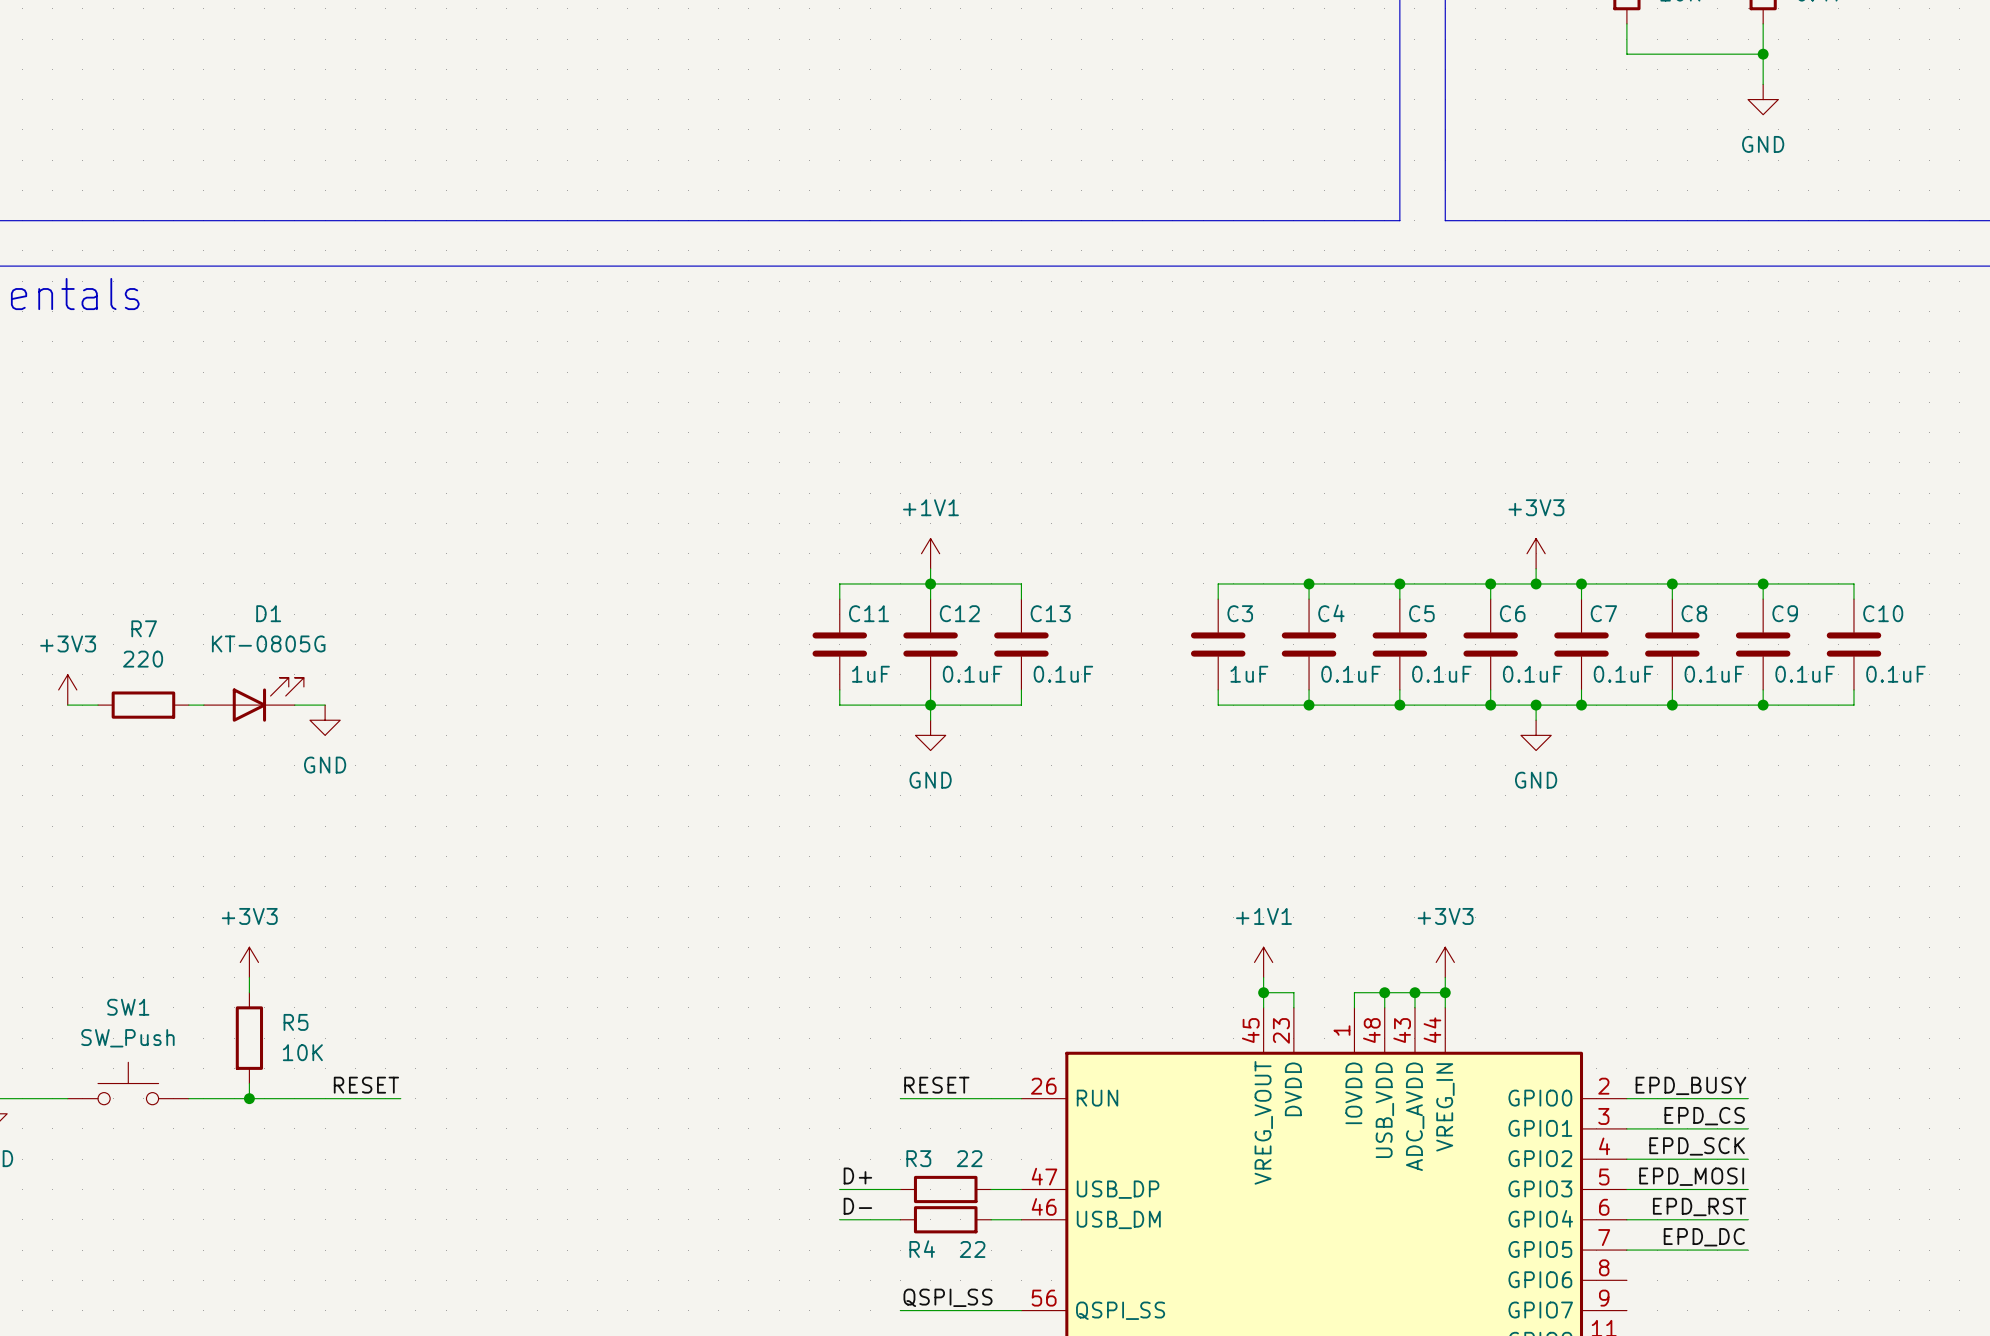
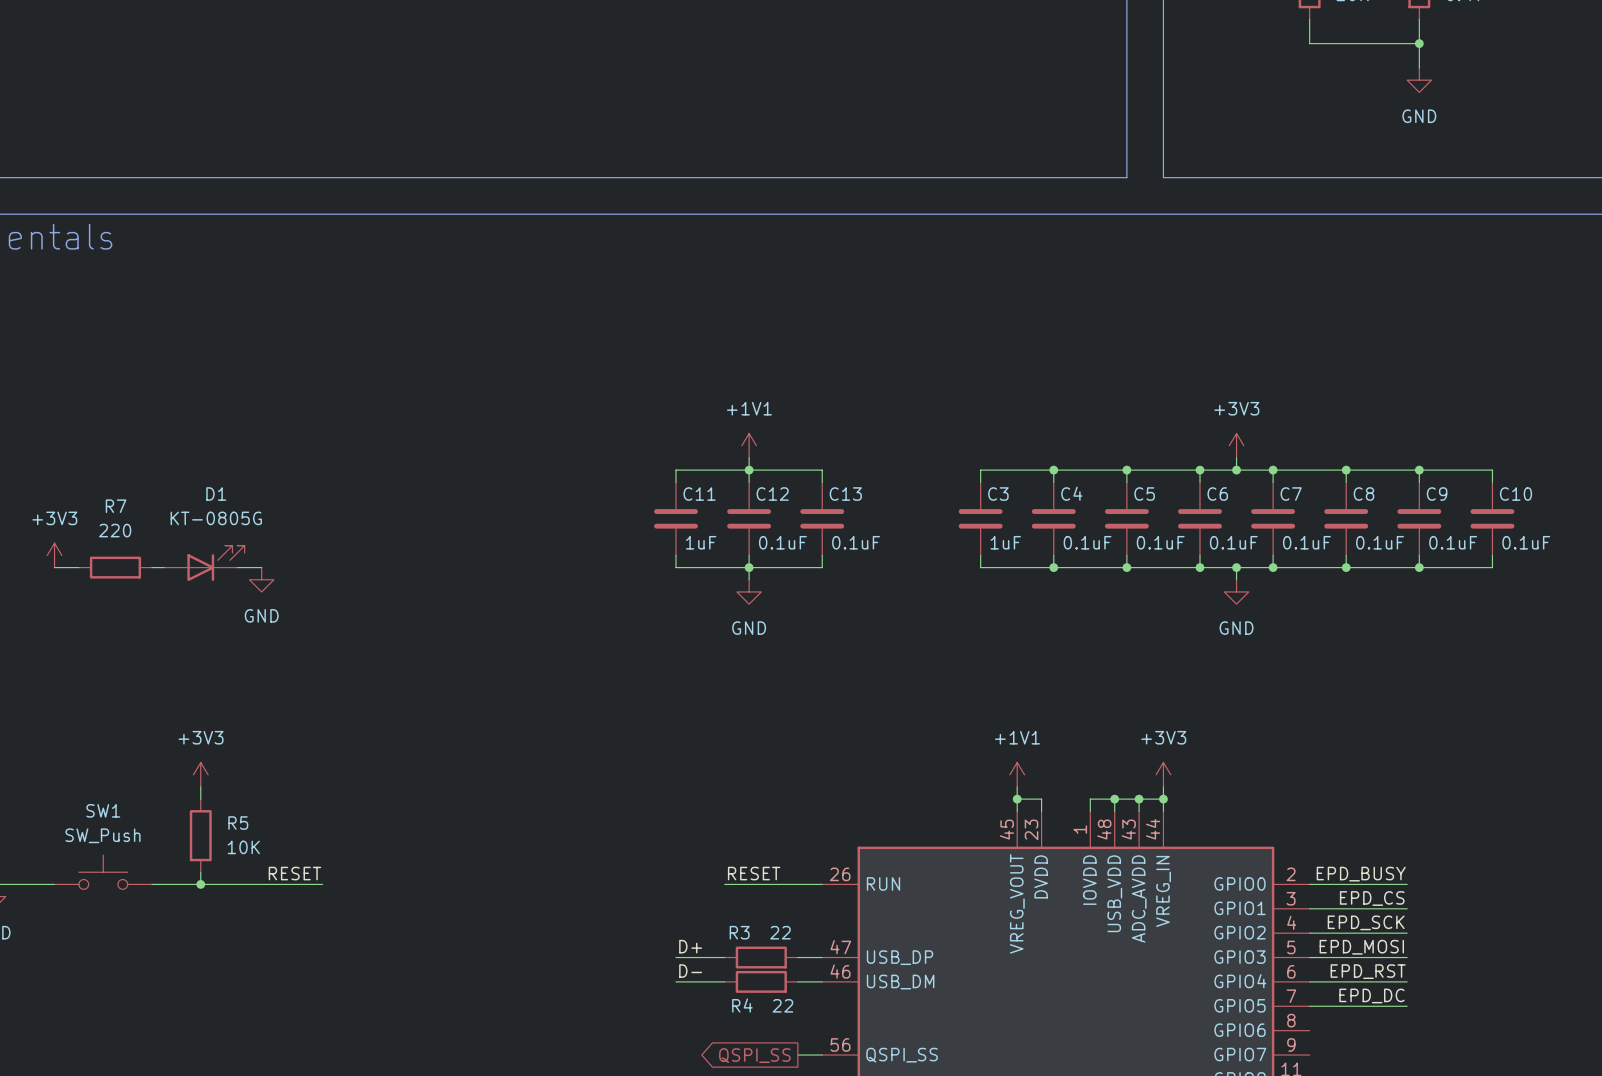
label: QSPI_SS (948, 1297) -> none
wire: (900, 1310) (991, 1310) -> none
global label: none -> QSPI_SS (754, 1055)

